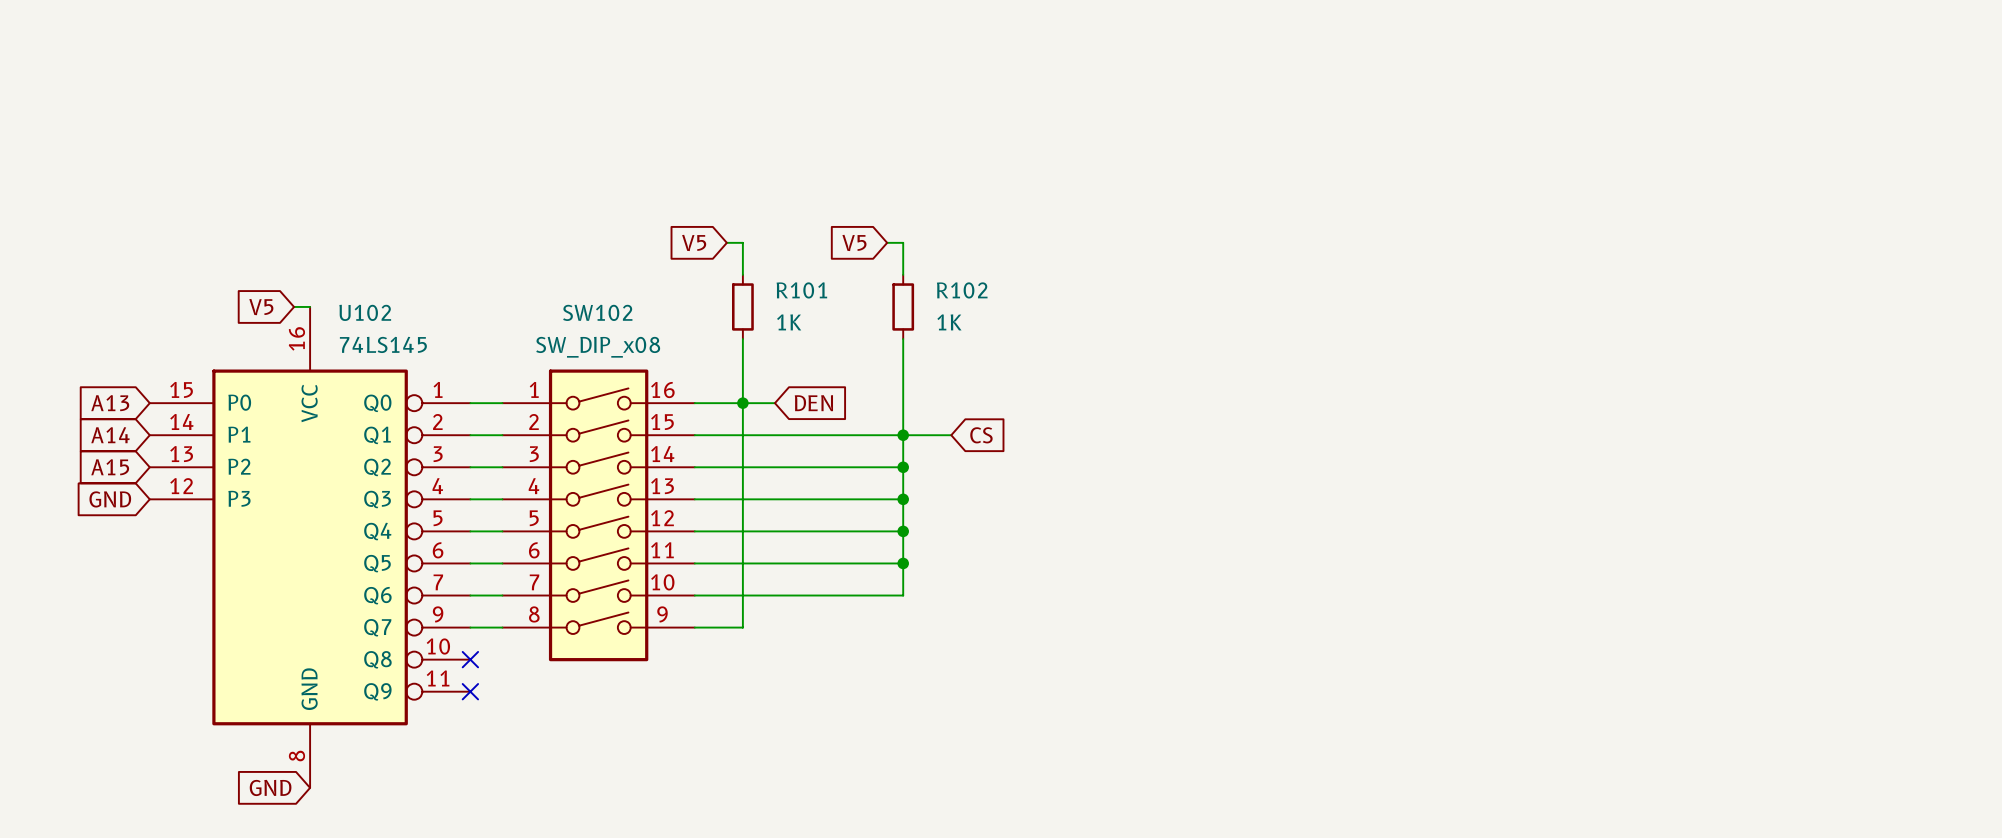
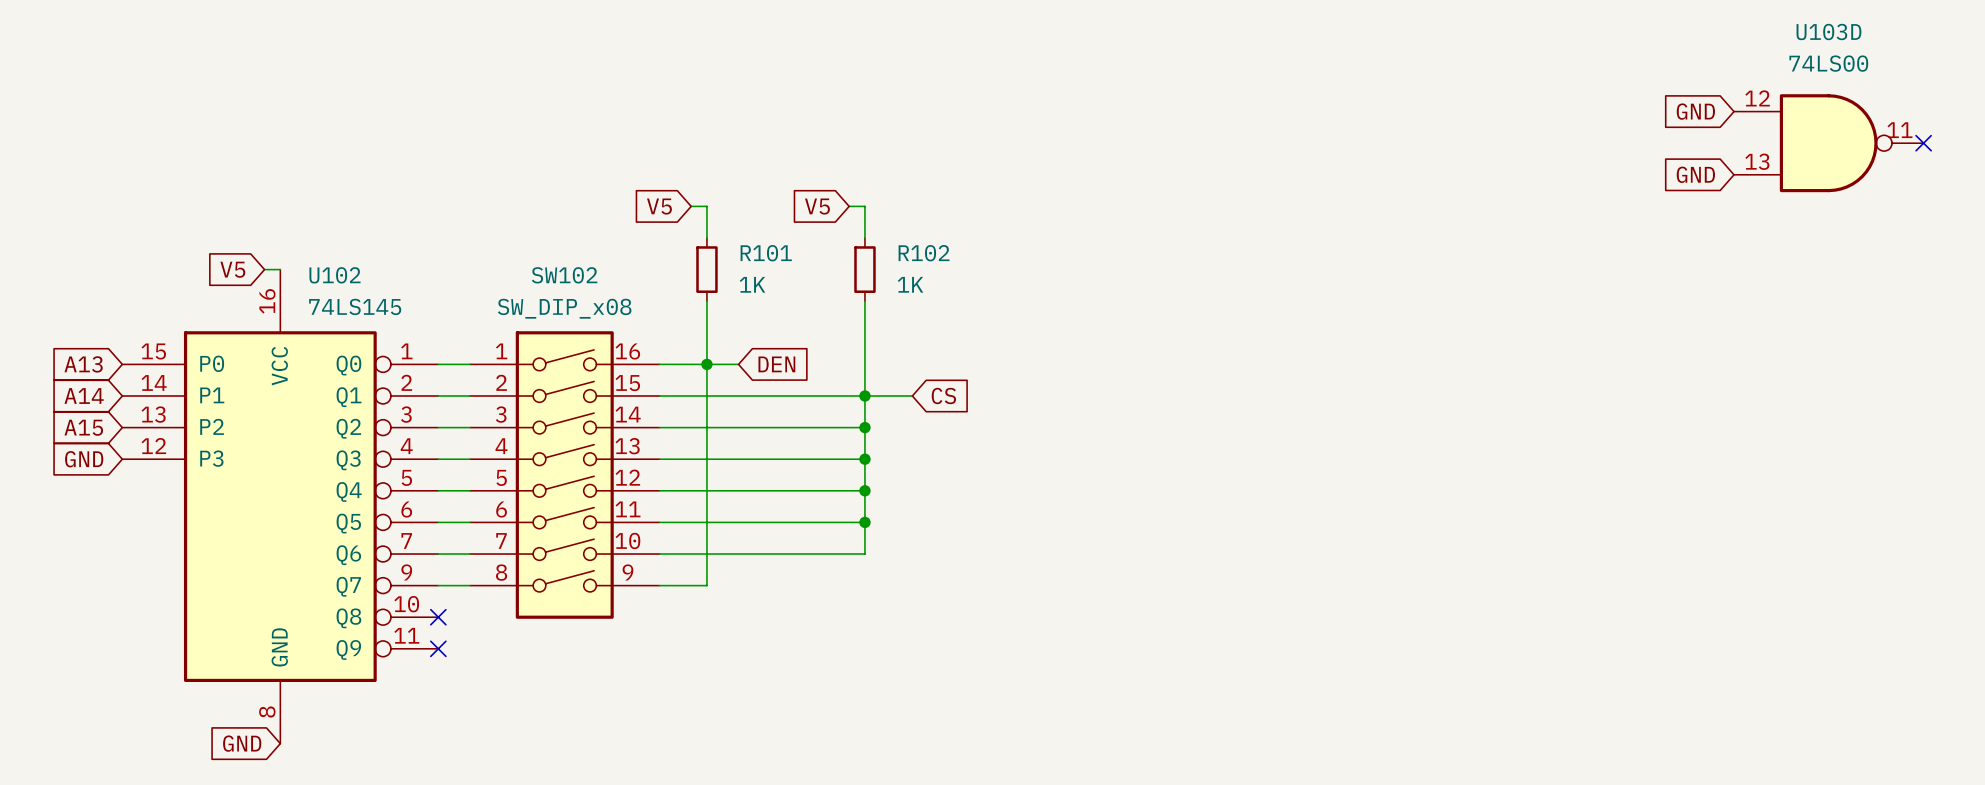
global label: none -> GND (1695, 111)
U103D: none -> 74LS00 (1828, 143)
no-connect mark: none -> (1923, 143)
global label: none -> GND (1695, 174)

